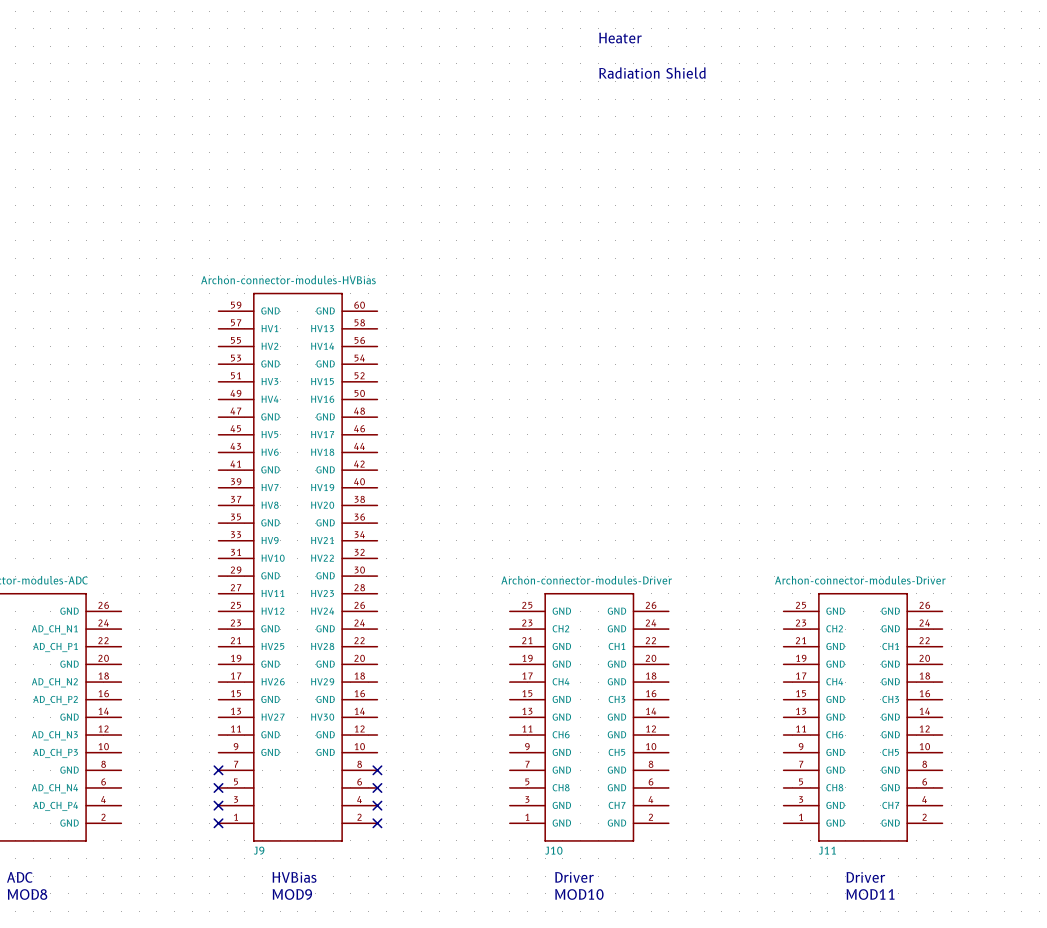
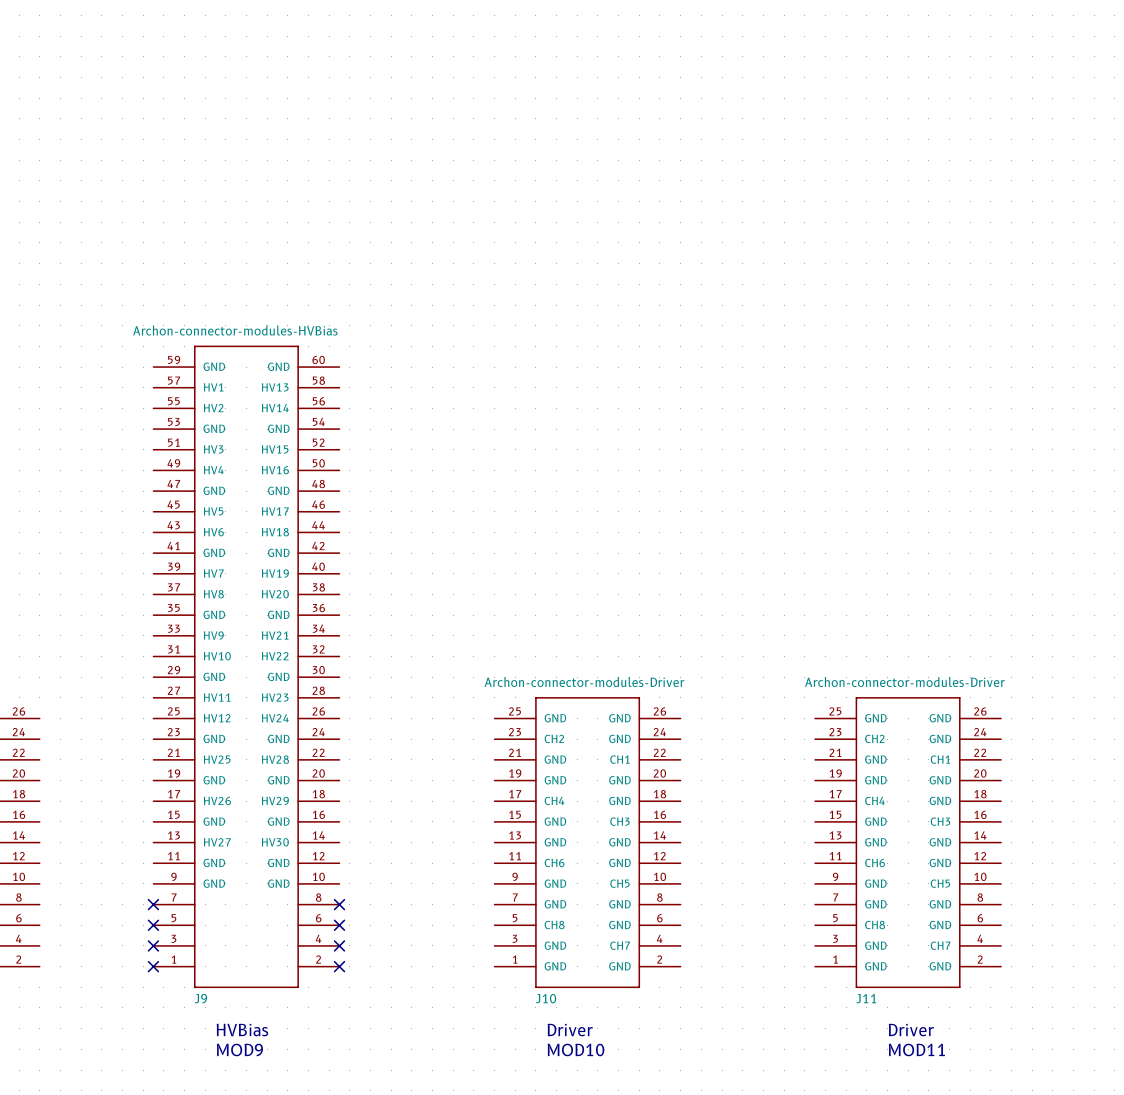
text: Heater (620, 38) -> none
text: Radiation Shield (652, 73) -> none

